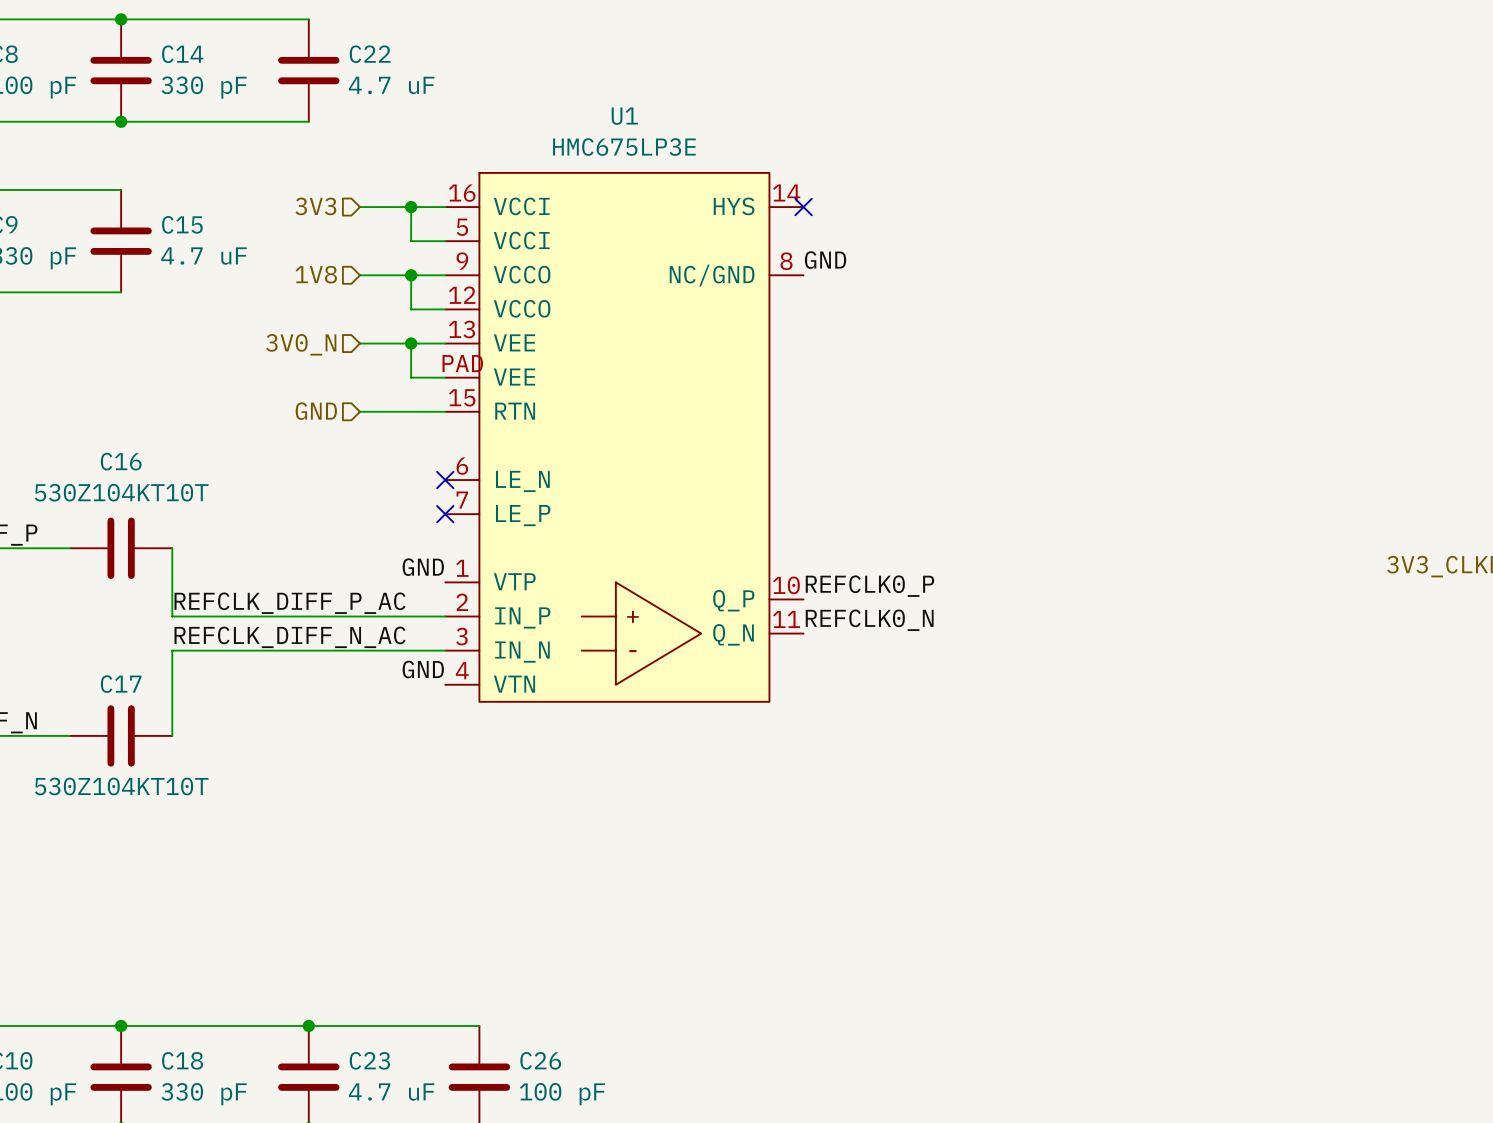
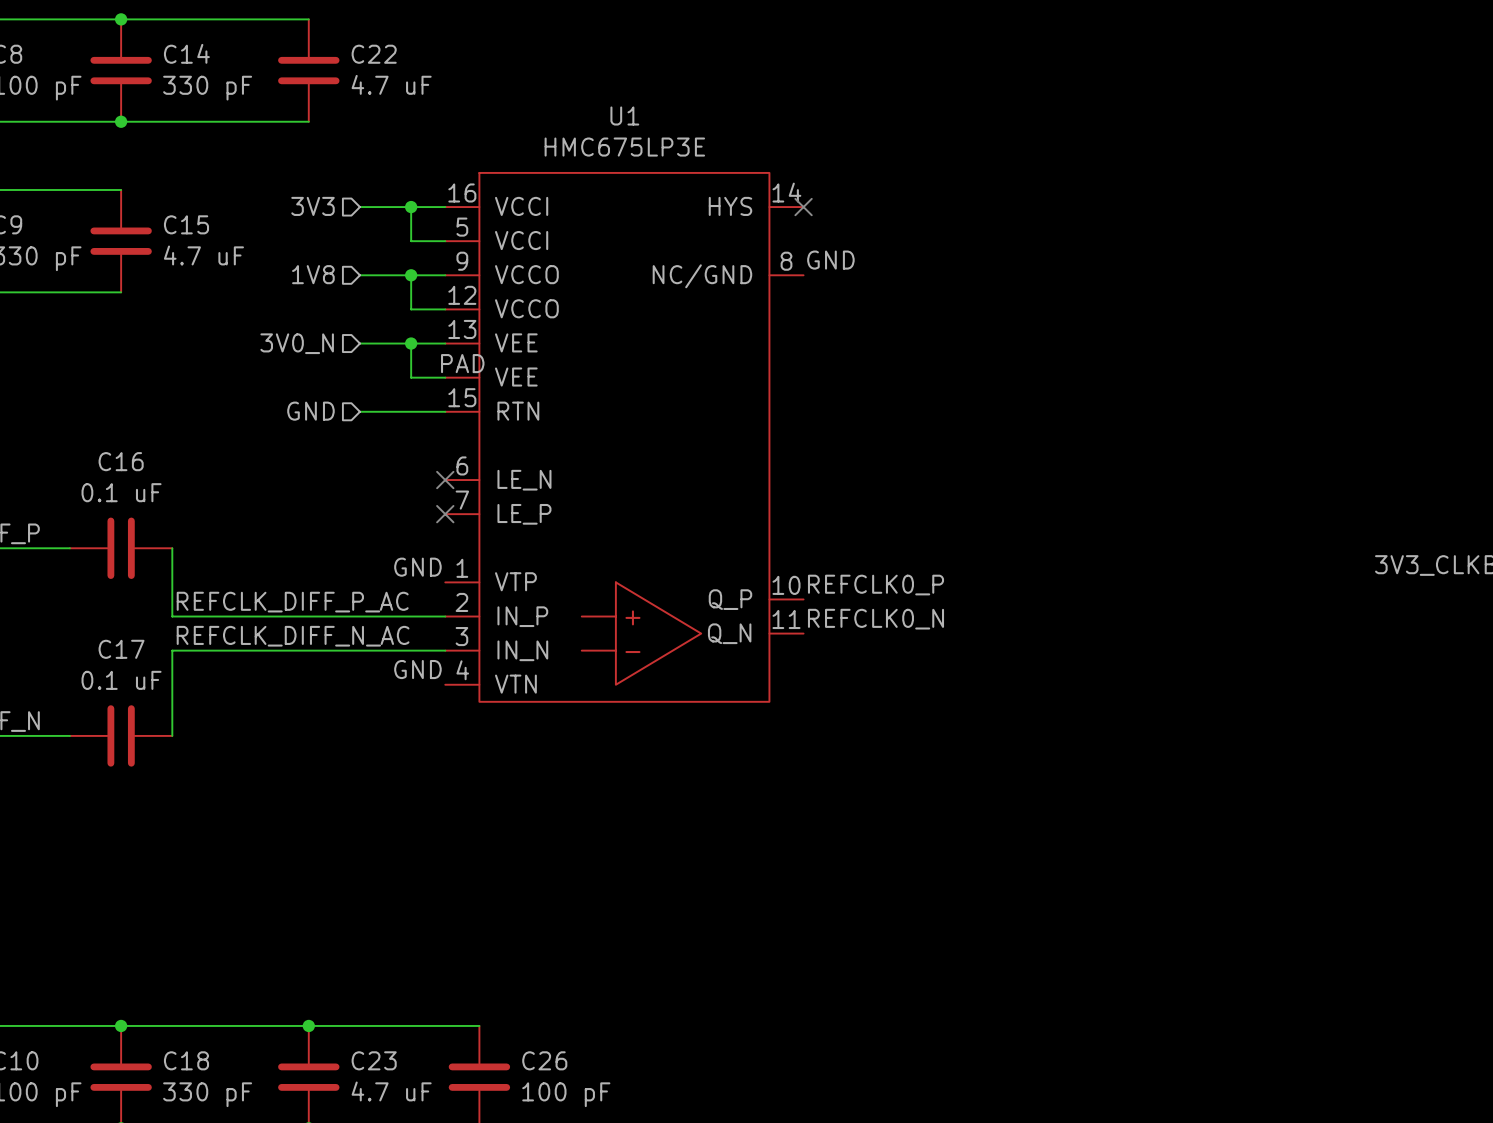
C16 value: 530Z104KT10T (121, 492) -> 0.1 uF (121, 492)
C17 name position: C17 (121, 684) -> C17 (121, 649)
C17 value: 530Z104KT10T (121, 786) -> 0.1 uF (121, 680)

